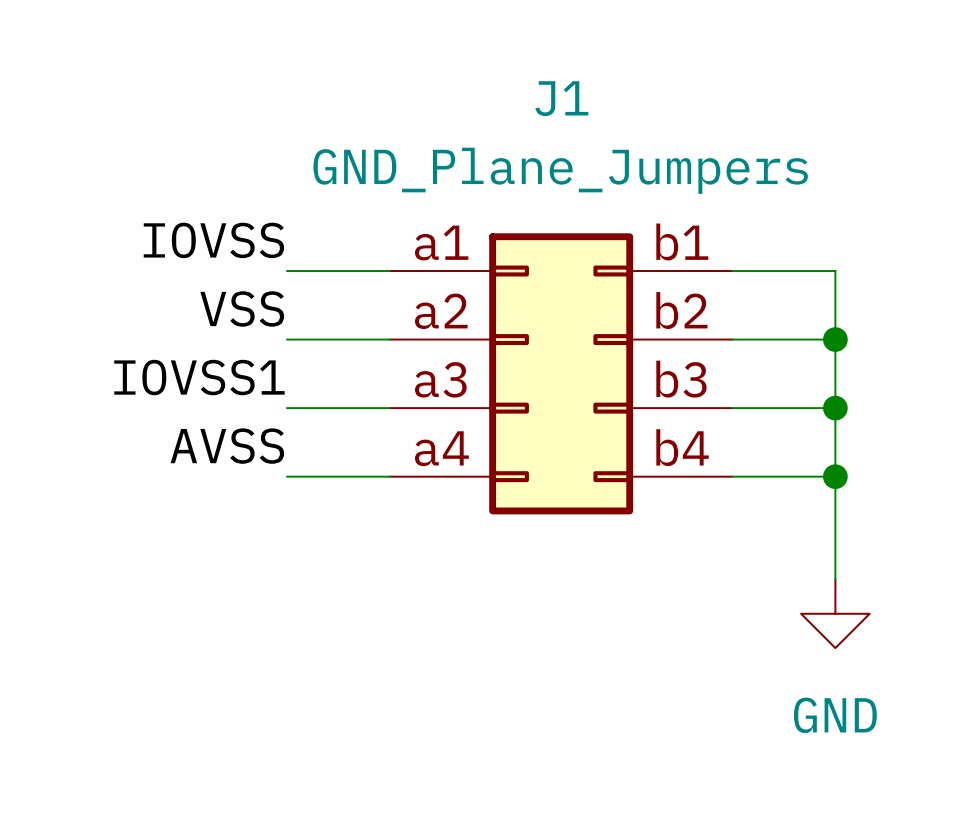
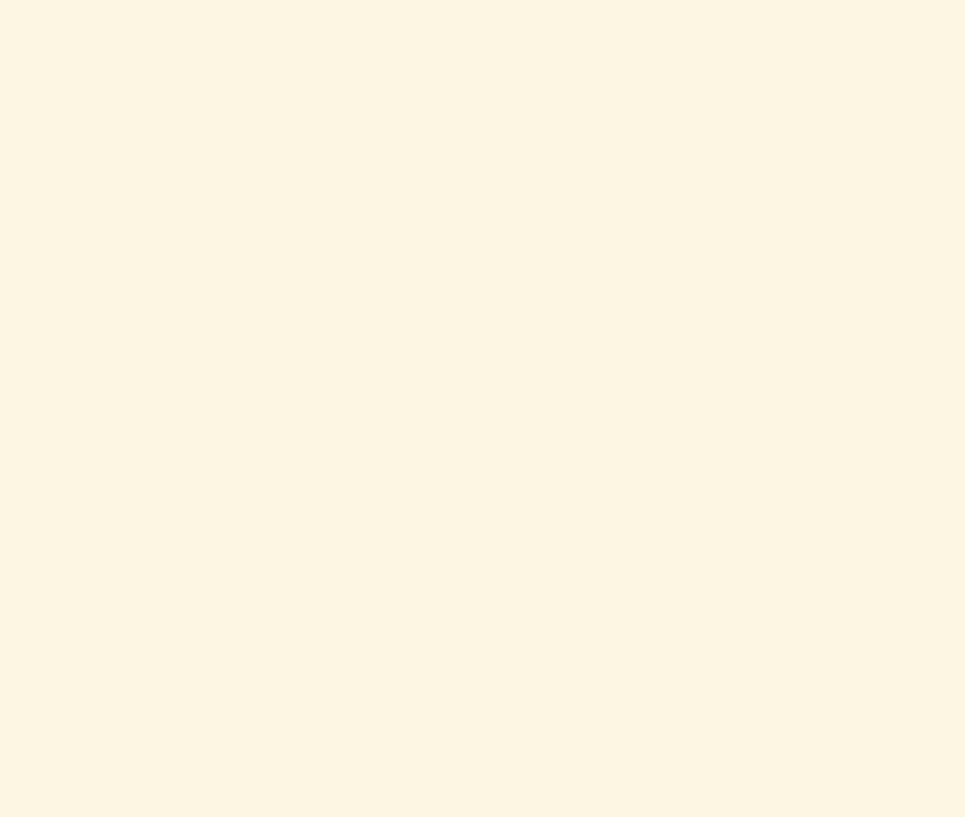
label: IOVSS (213, 240) -> none
wire: (286, 271) (389, 271) -> none
wire: (732, 271) (835, 271) (835, 579) -> none
label: VSS (242, 308) -> none
wire: (286, 339) (389, 339) -> none
wire: (732, 339) (835, 339) -> none
junction: (835, 339) -> none
J1: GND_Plane_Jumpers (561, 373) -> none
label: IOVSS1 (199, 377) -> none
wire: (286, 408) (389, 408) -> none
wire: (732, 408) (835, 408) -> none
junction: (835, 408) -> none
label: AVSS (227, 446) -> none
wire: (286, 476) (389, 476) -> none
wire: (732, 476) (835, 476) -> none
junction: (835, 476) -> none
power symbol: GND (835, 613) -> none

